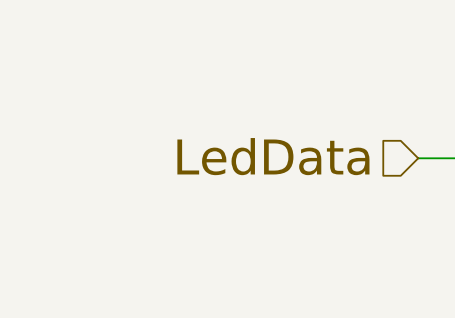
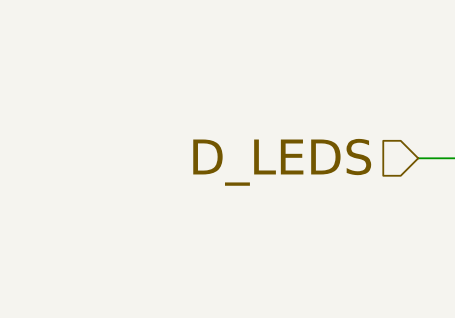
hierarchical label: LedData (273, 156) -> D_LEDS (282, 162)

